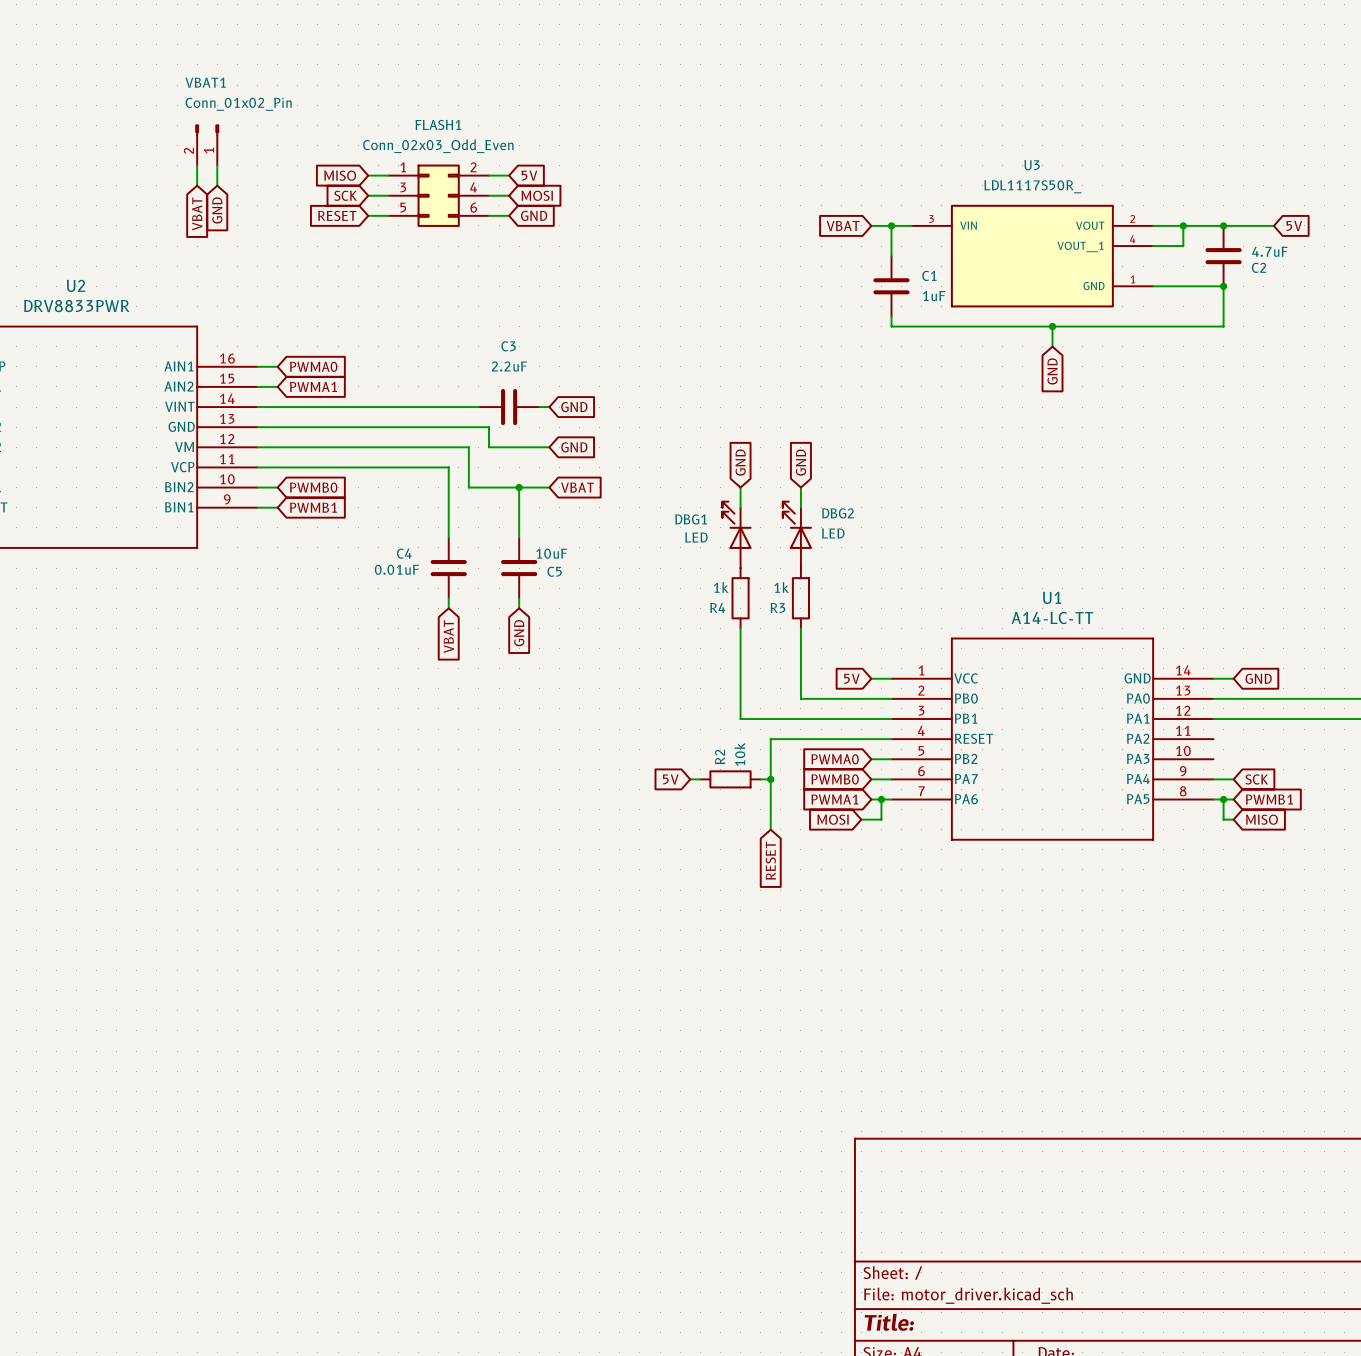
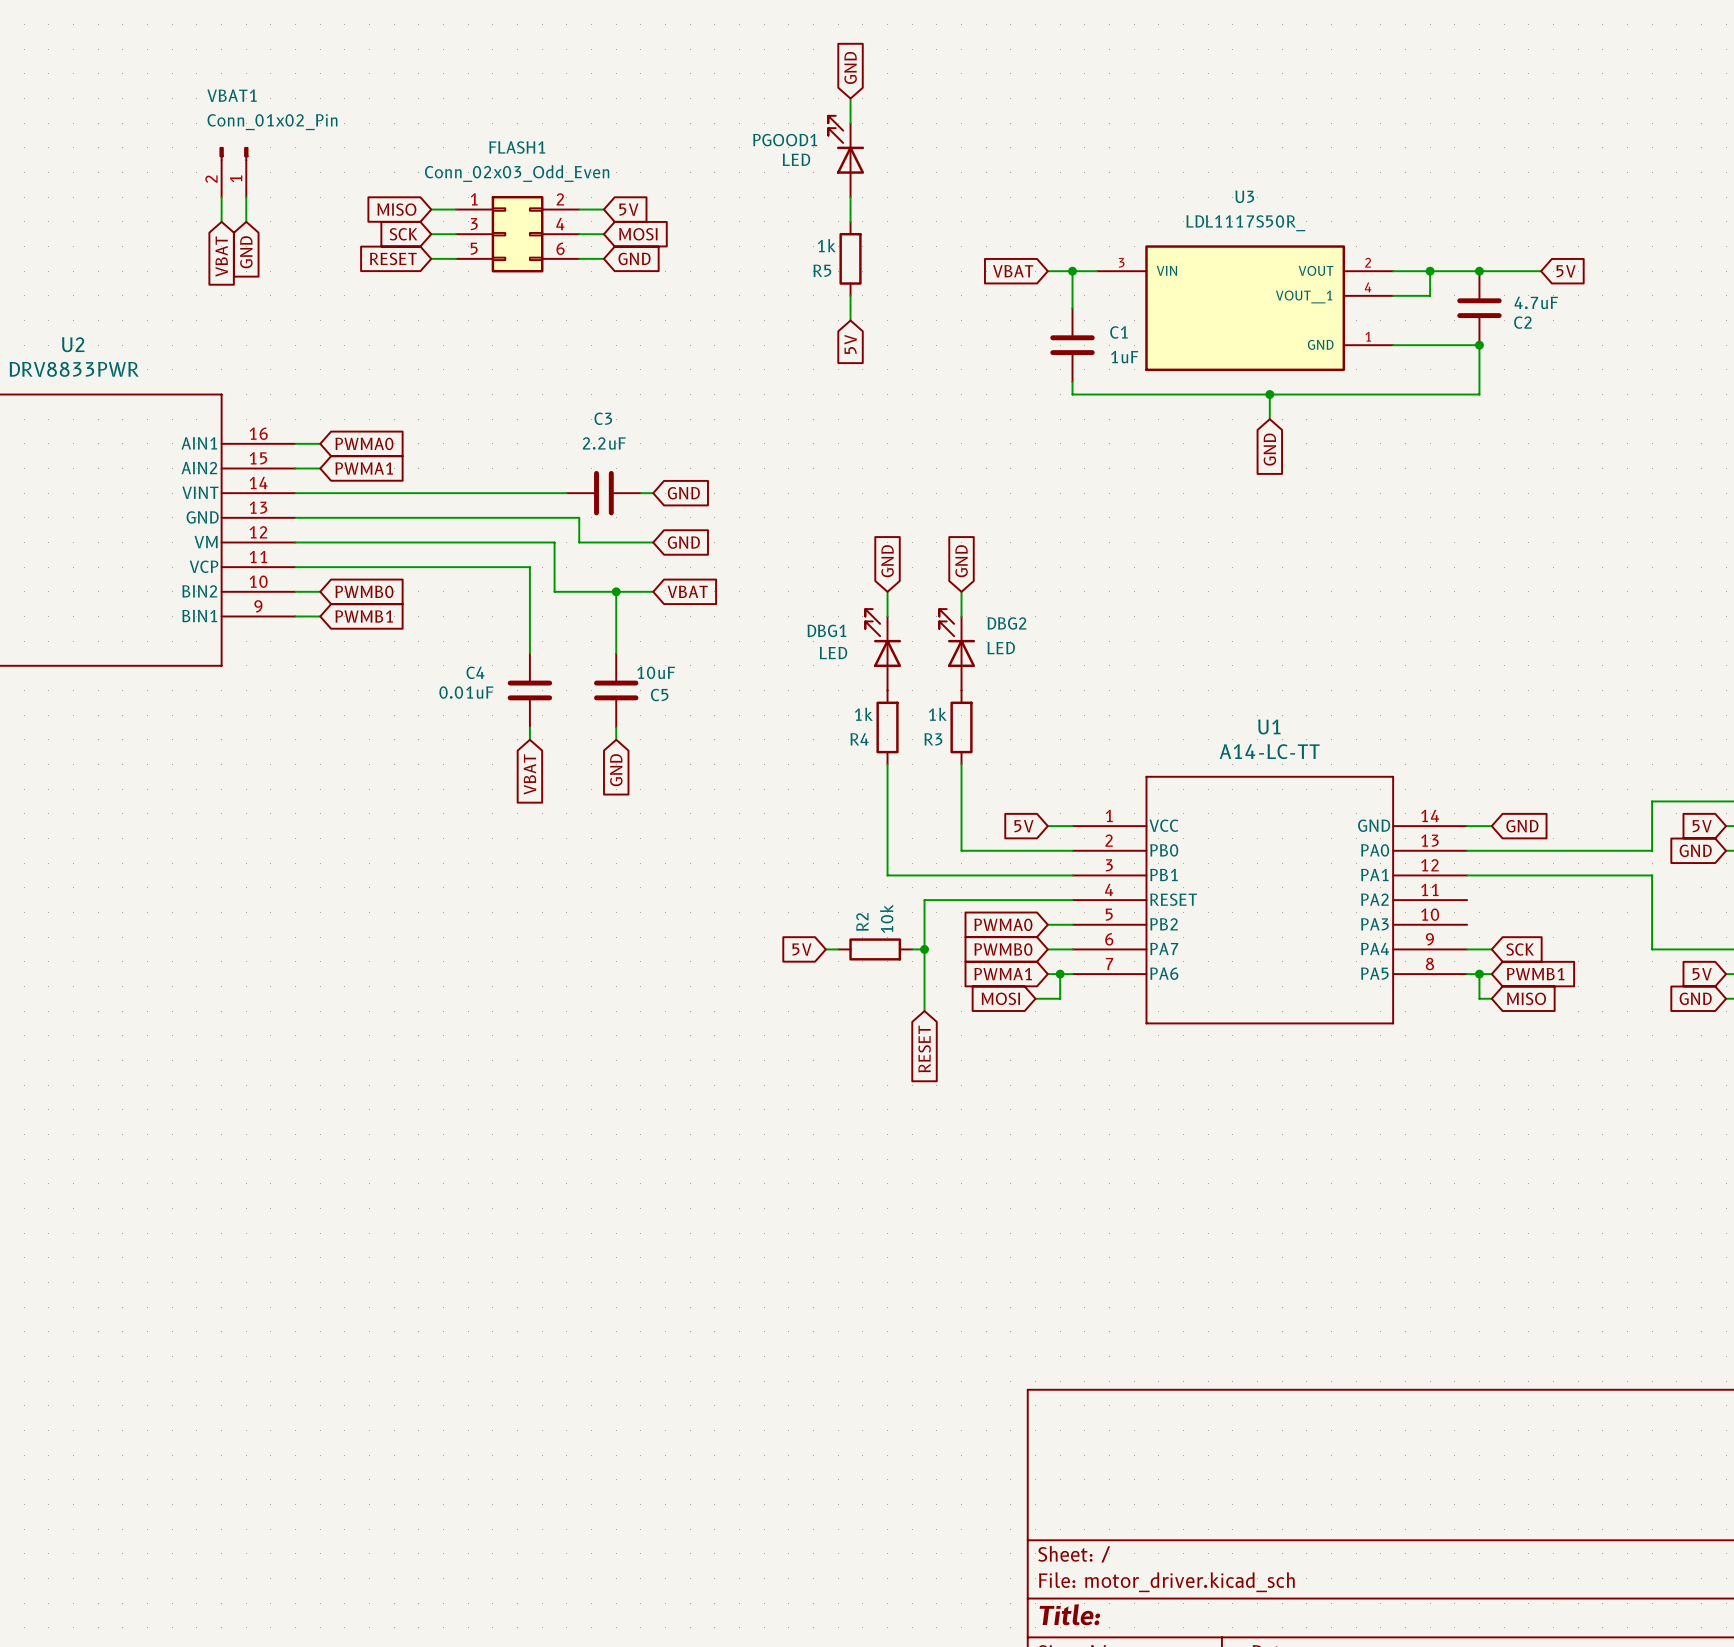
global label: none -> GND (850, 67)
wire: none -> (850, 98) (850, 123)
PGOOD1: none -> LED (846, 156)
wire: none -> (850, 197) (850, 221)
R5: none -> 1k (850, 258)
wire: none -> (850, 295) (850, 320)
global label: none -> 5V (850, 344)

